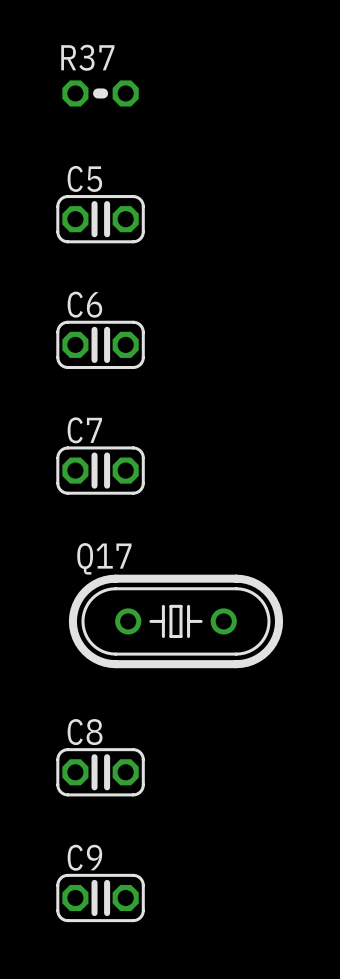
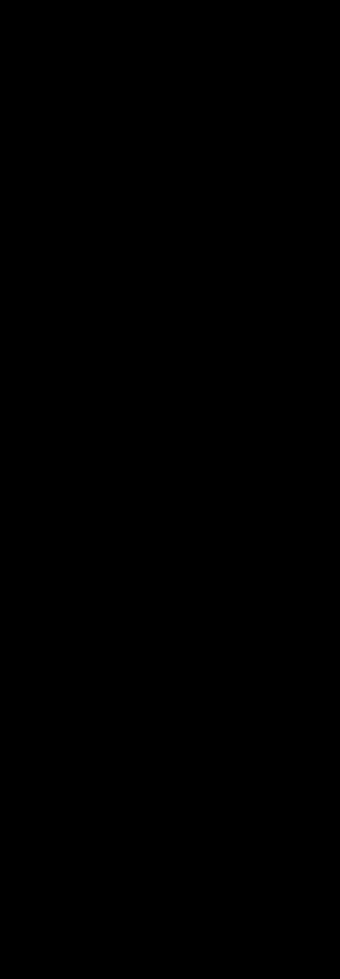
R37: (100, 93) -> none
C5: (100, 219) -> none
C6: (100, 344) -> none
C7: (100, 470) -> none
Q17: (175, 621) -> none
C8: (100, 772) -> none
C9: (100, 897) -> none

